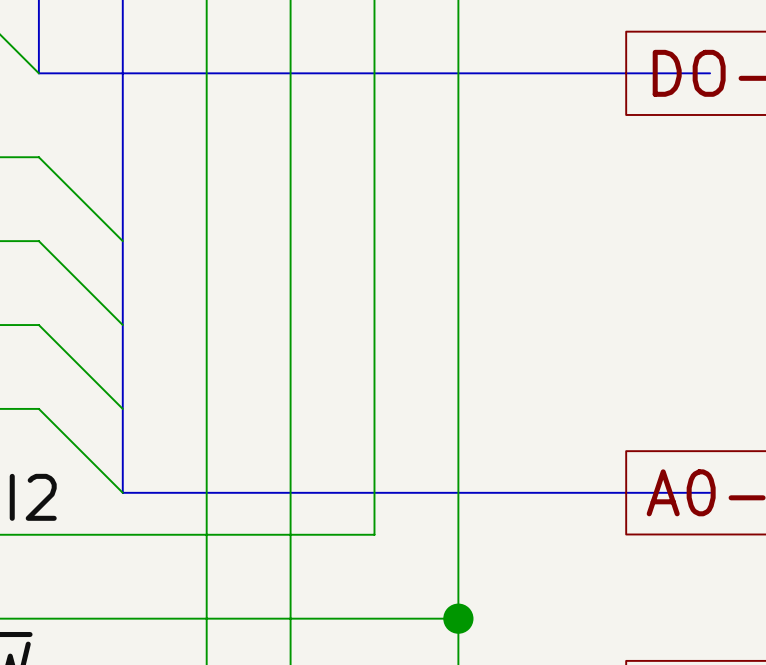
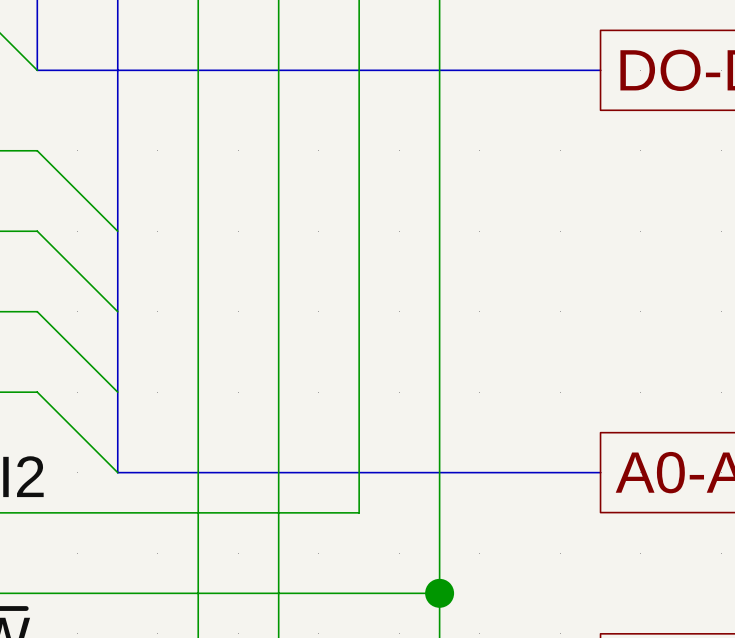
bus: (626, 73) (710, 73) -> none
bus: (626, 492) (710, 492) -> none

